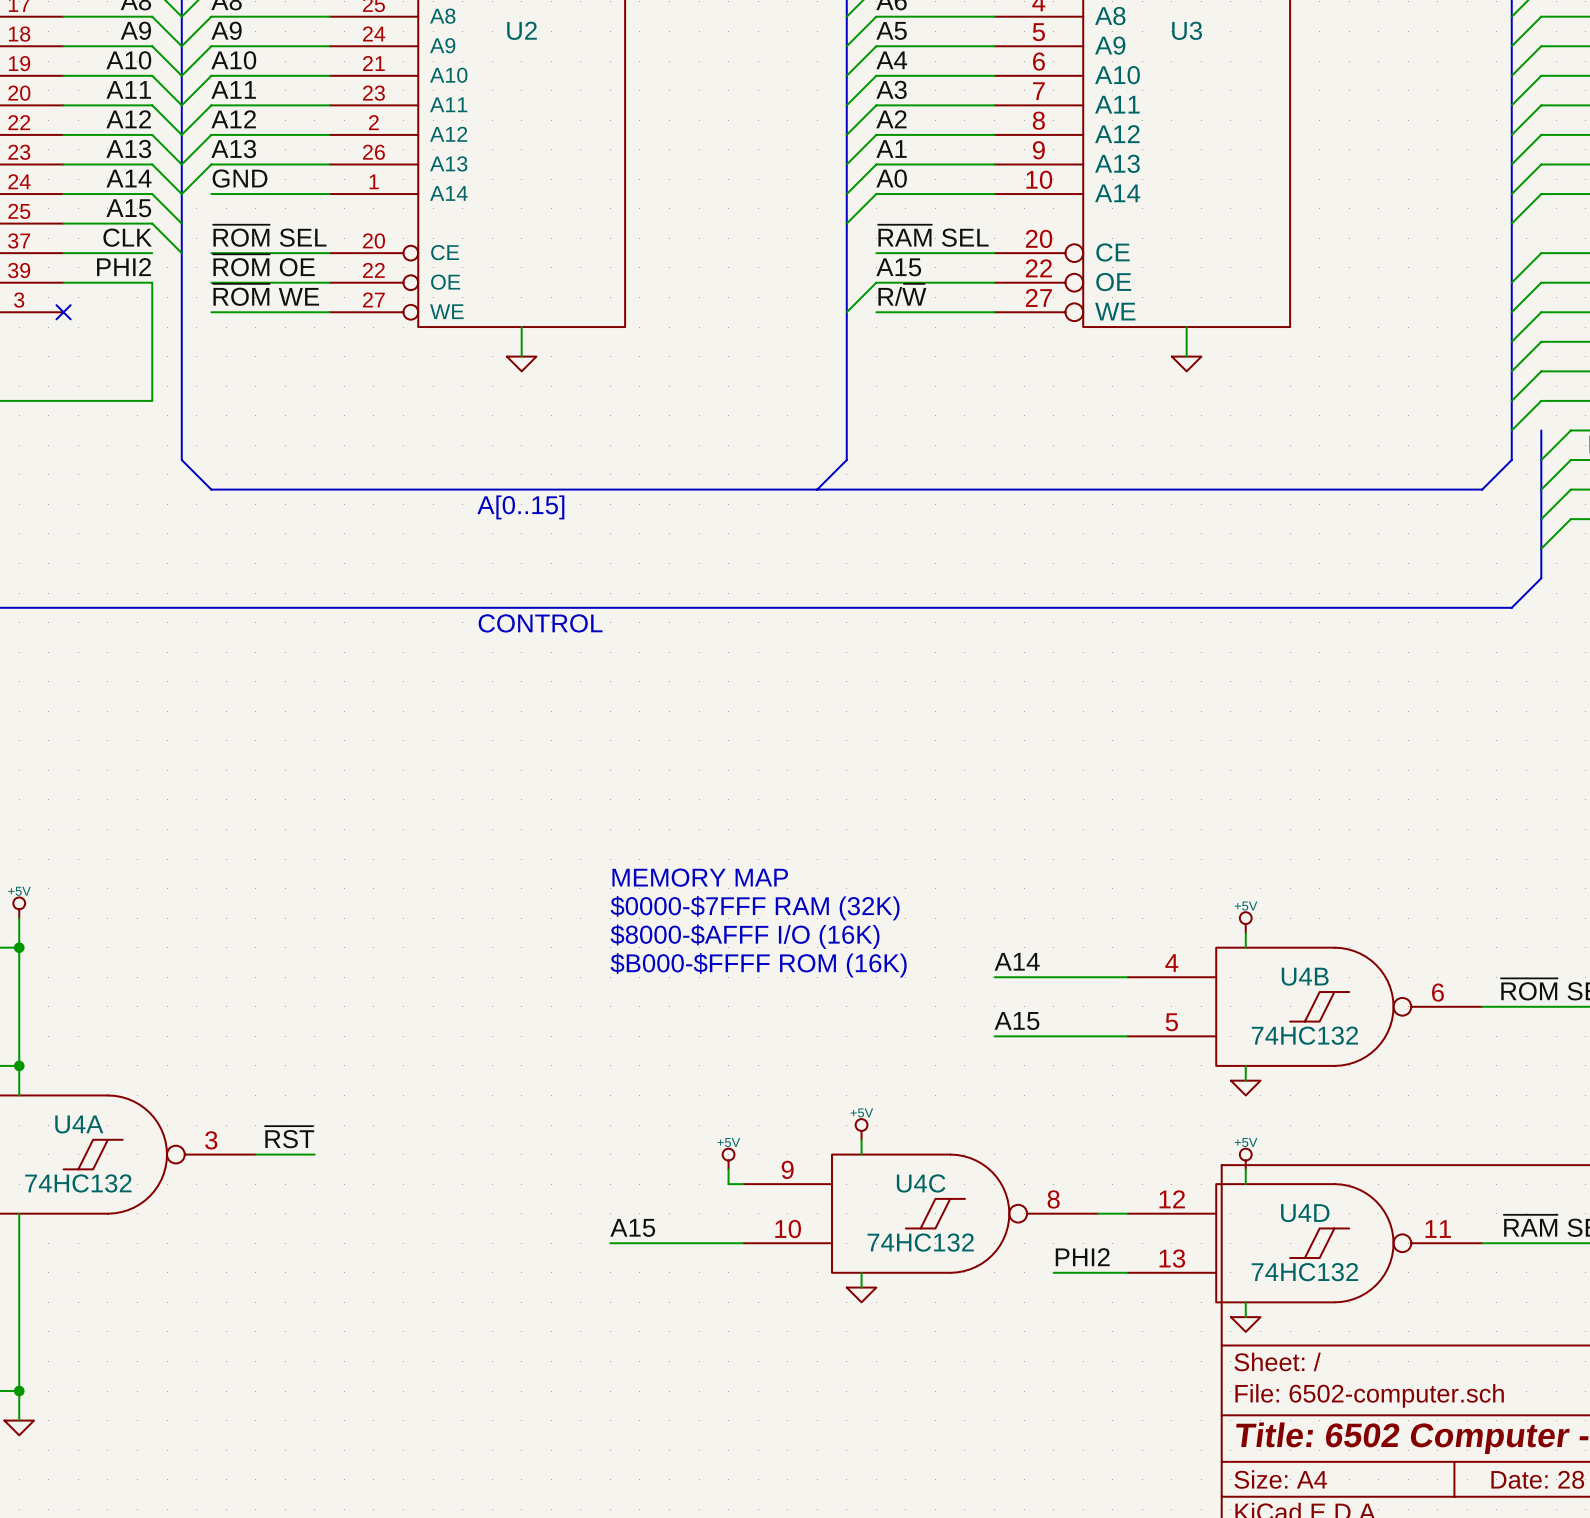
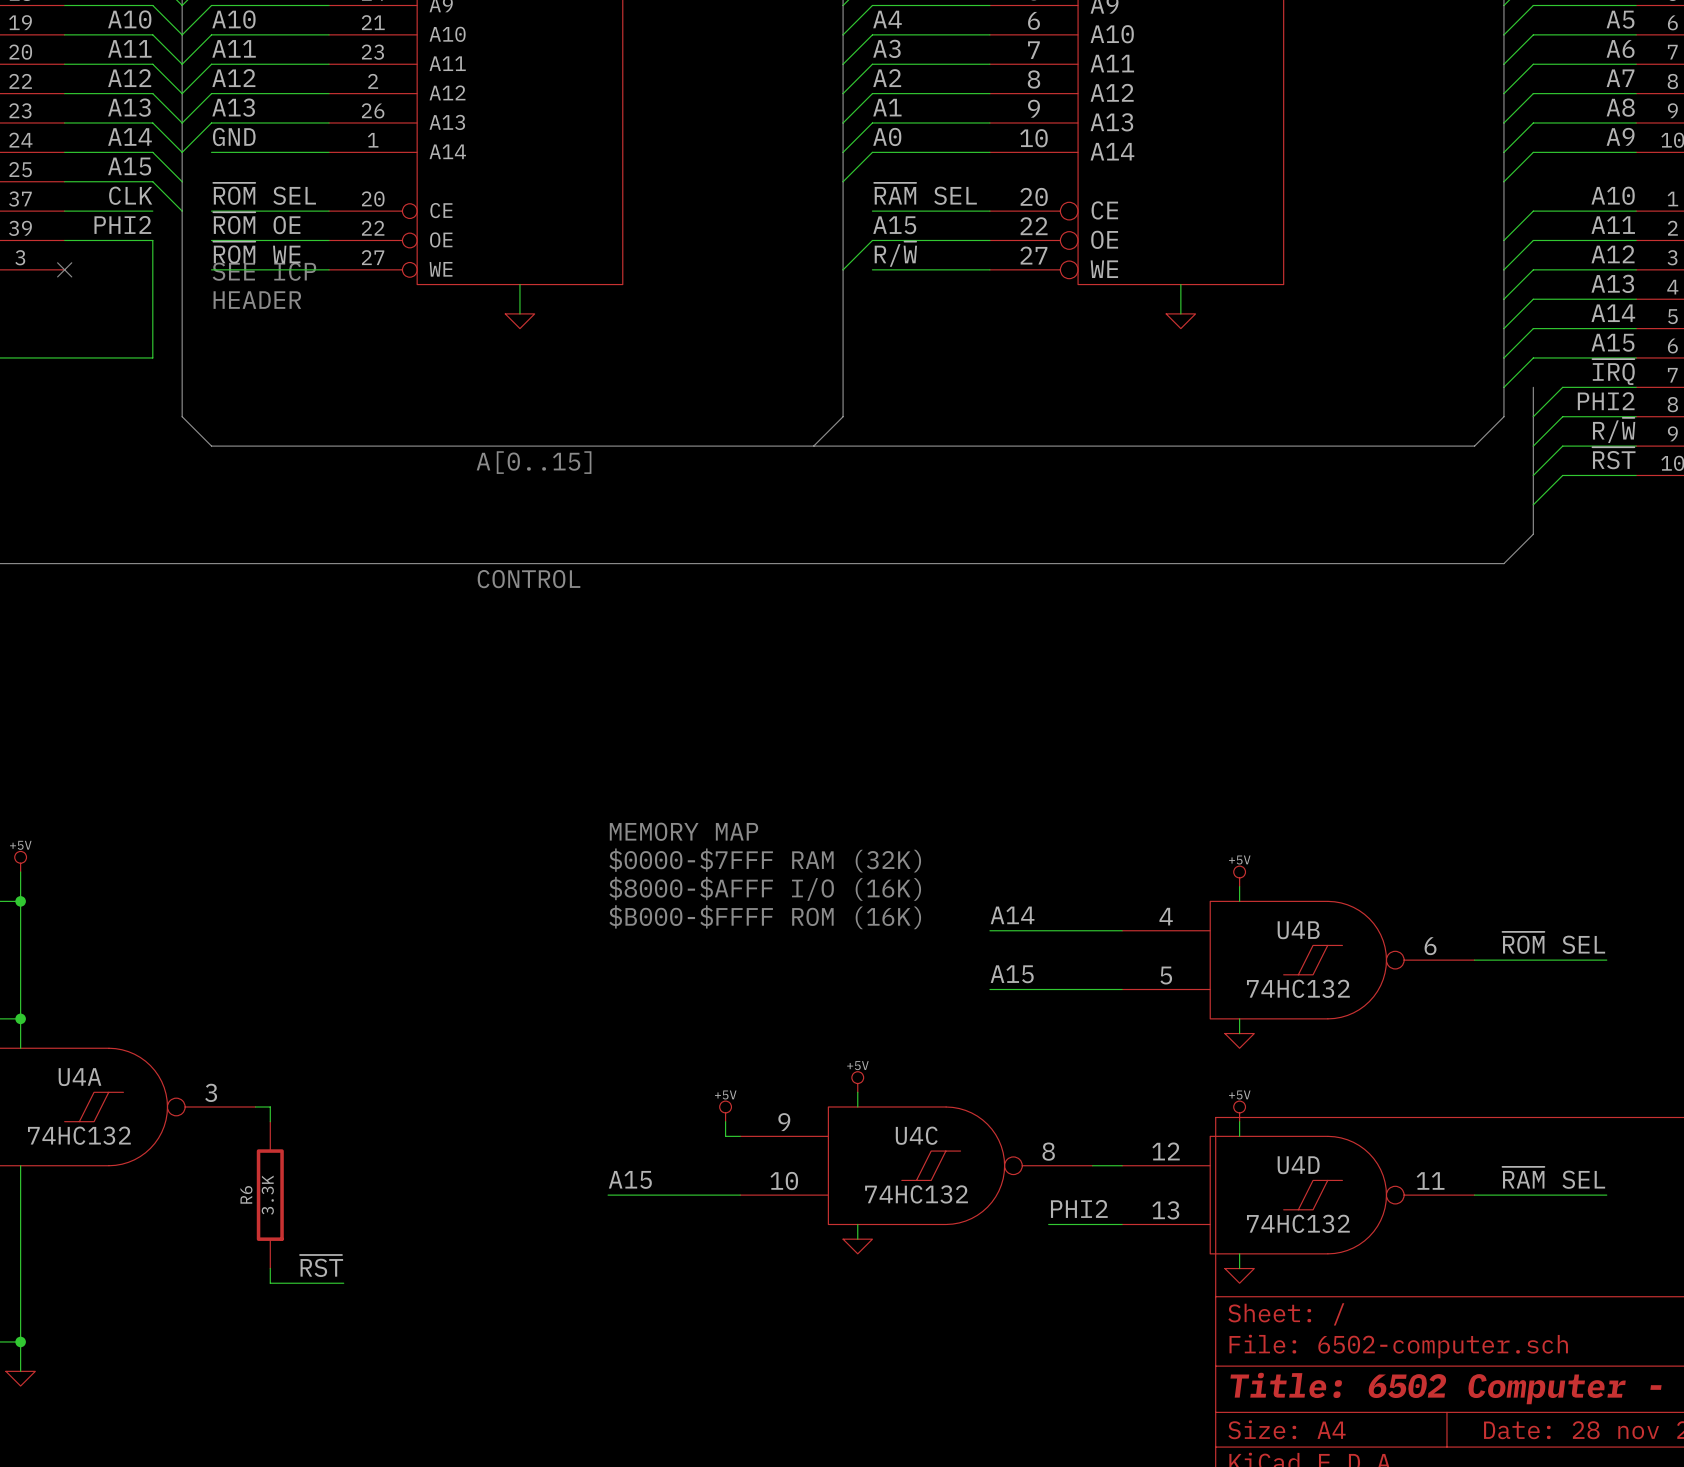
text: none -> SEE ICP (264, 271)
text: none -> HEADER (257, 300)
label position: ~{RST} (289, 1137) -> ~{RST} (321, 1265)
wire: (270, 1154) (314, 1154) -> (270, 1106) (270, 1121)
R6: none -> 3.3K (270, 1195)
wire: none -> (270, 1268) (270, 1283) (343, 1283)

